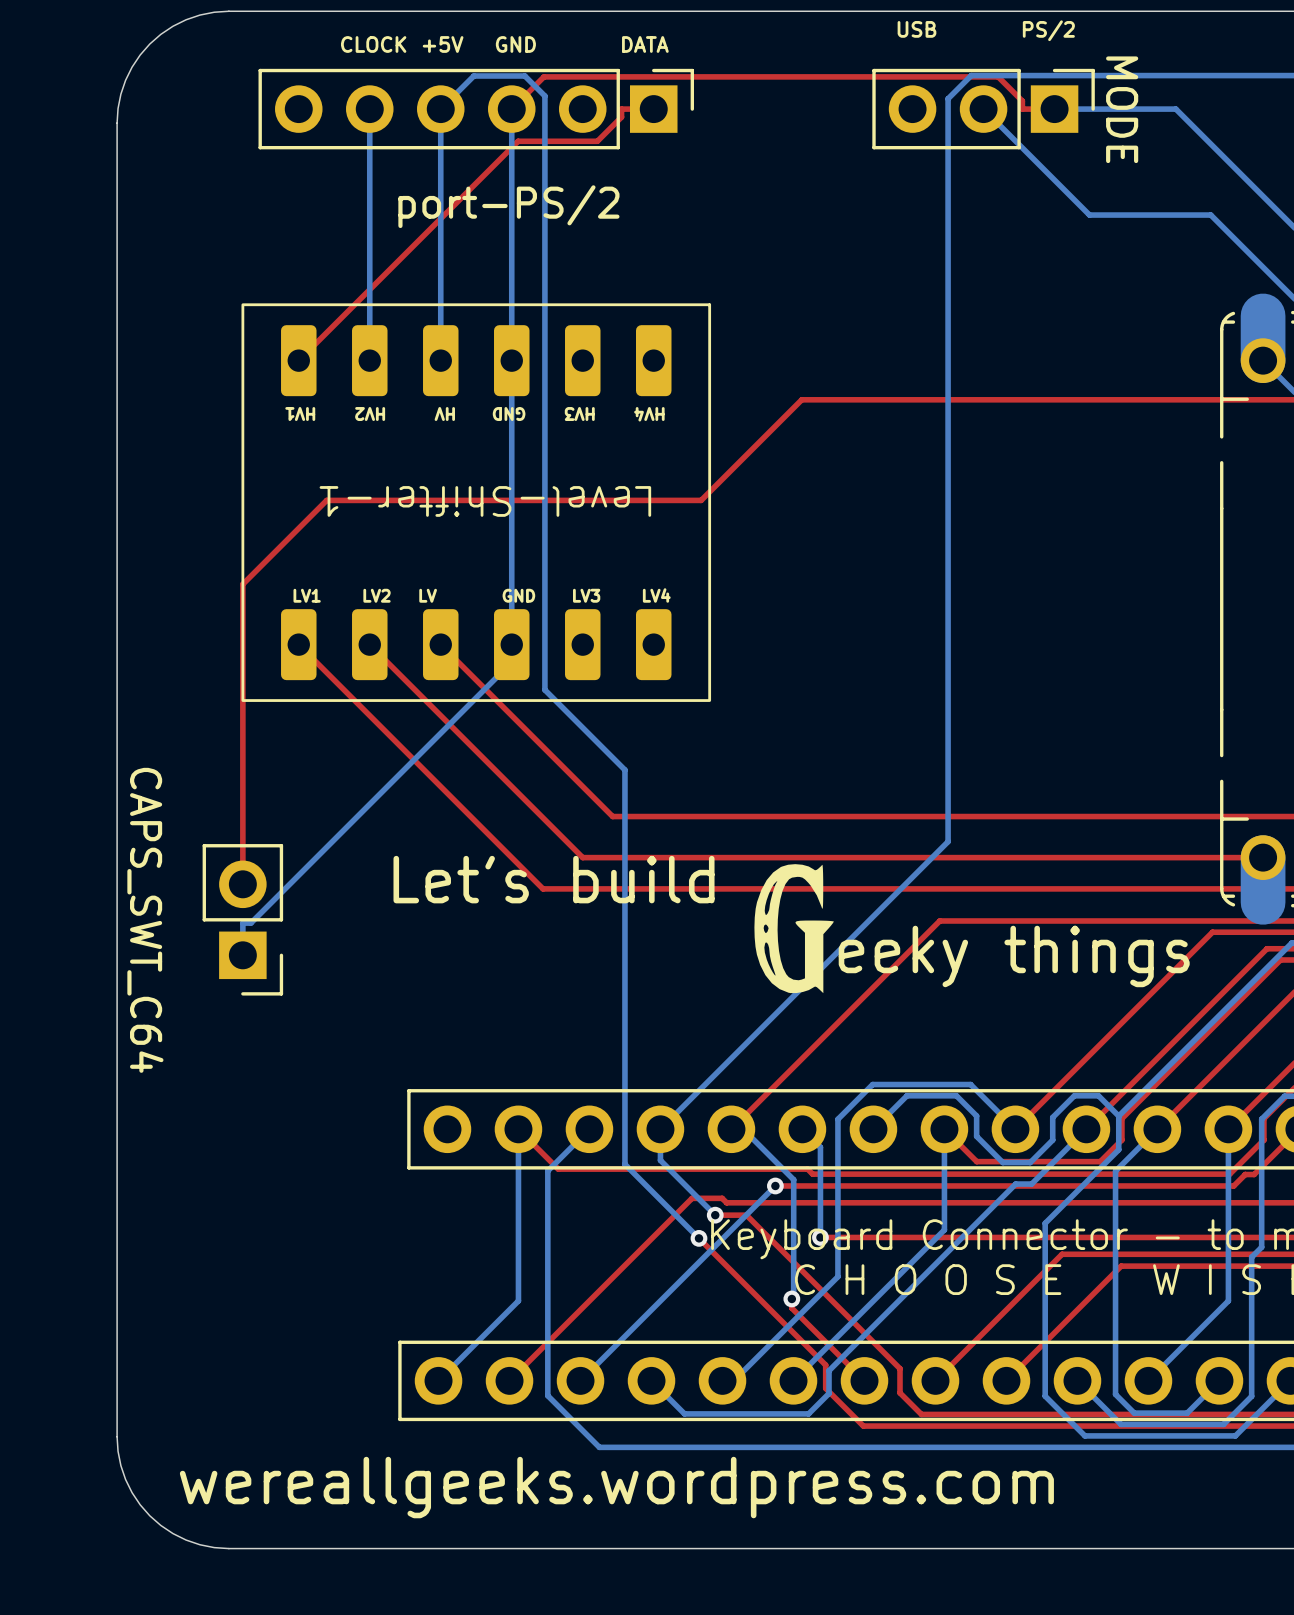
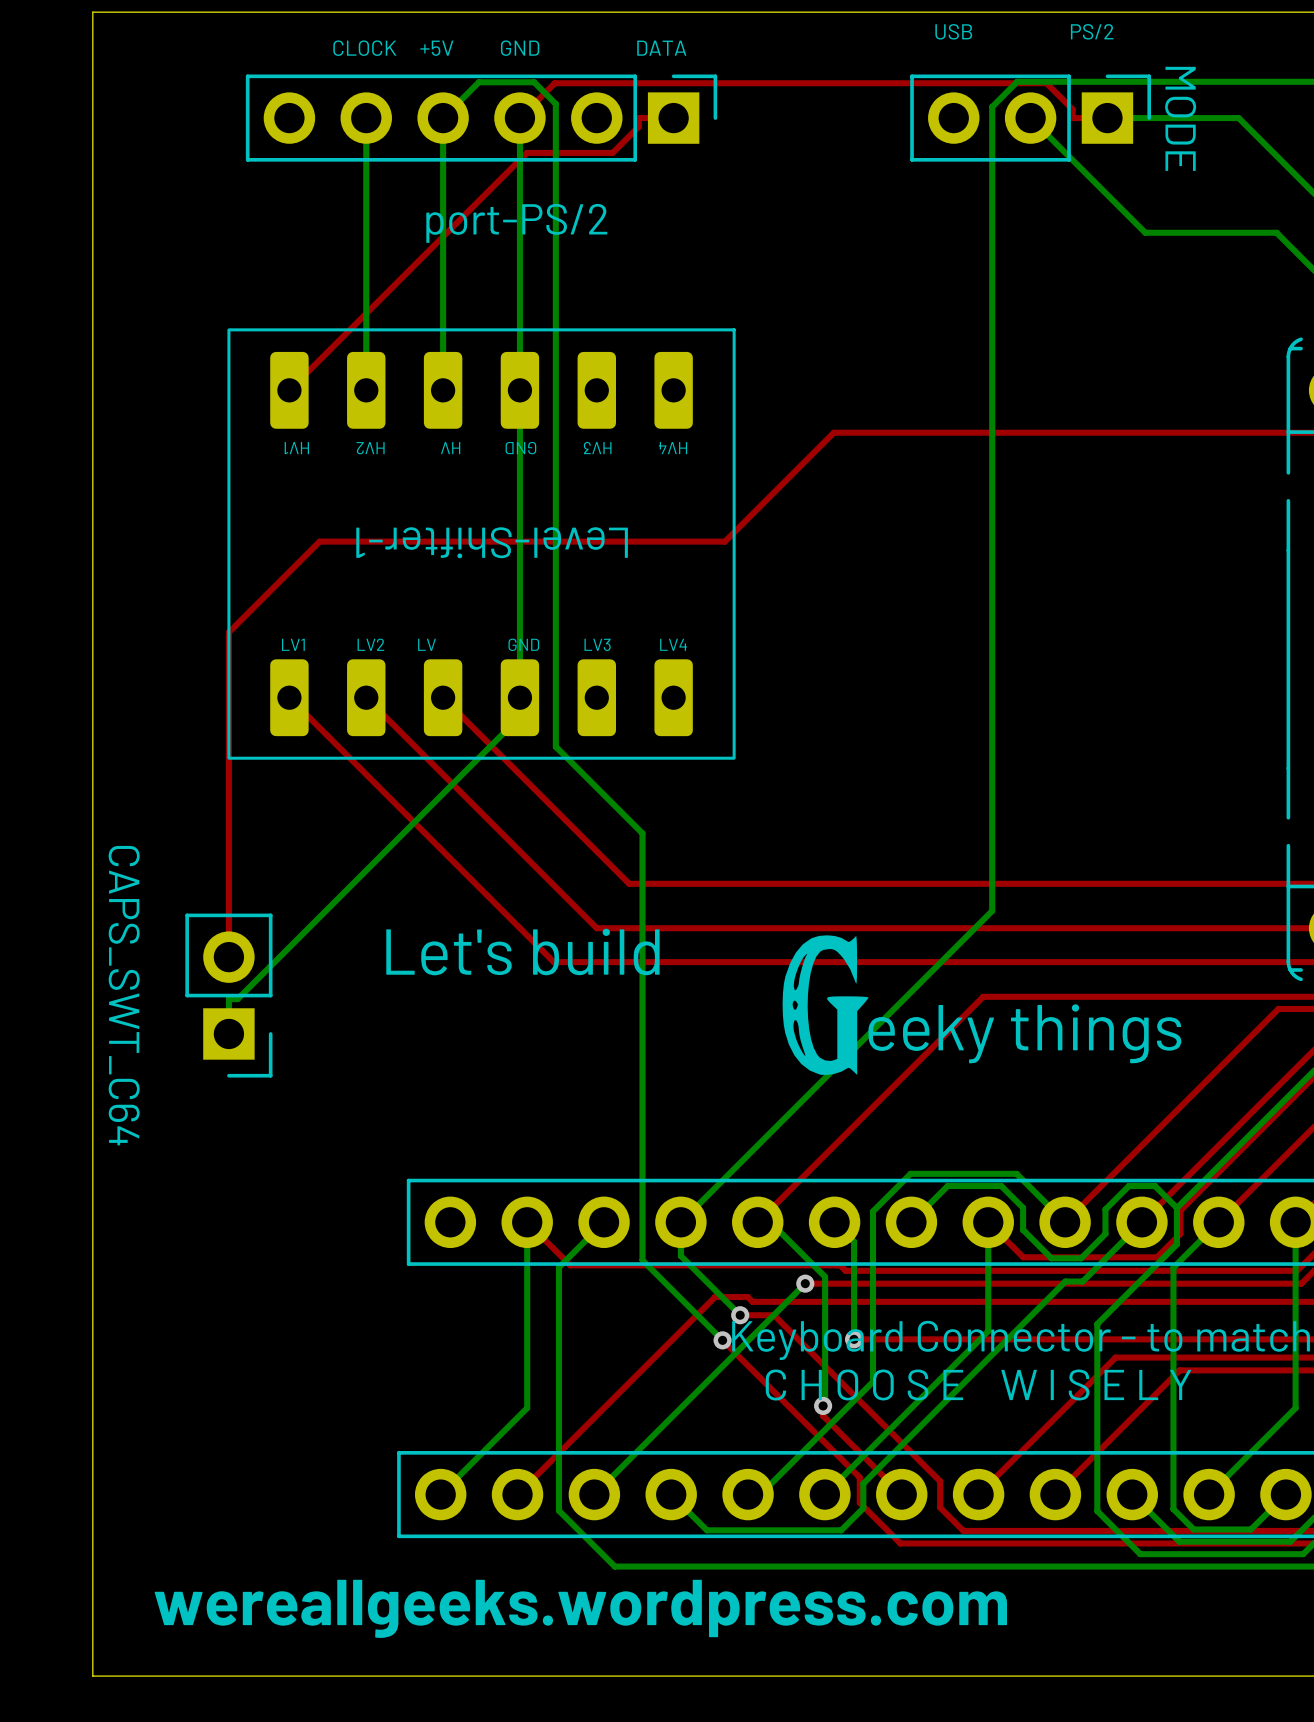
board edge: (228, 11) (214, 12) (186, 19) (172, 26) (149, 44) (132, 67) (125, 80) (118, 108) (117, 123) -> (213, 12) (92, 12) (92, 133)
board edge: (117, 1436) (118, 1451) (125, 1479) (140, 1504) (149, 1515) (160, 1525) (186, 1540) (199, 1544) (228, 1548) -> (92, 1555) (92, 1676) (213, 1676)

